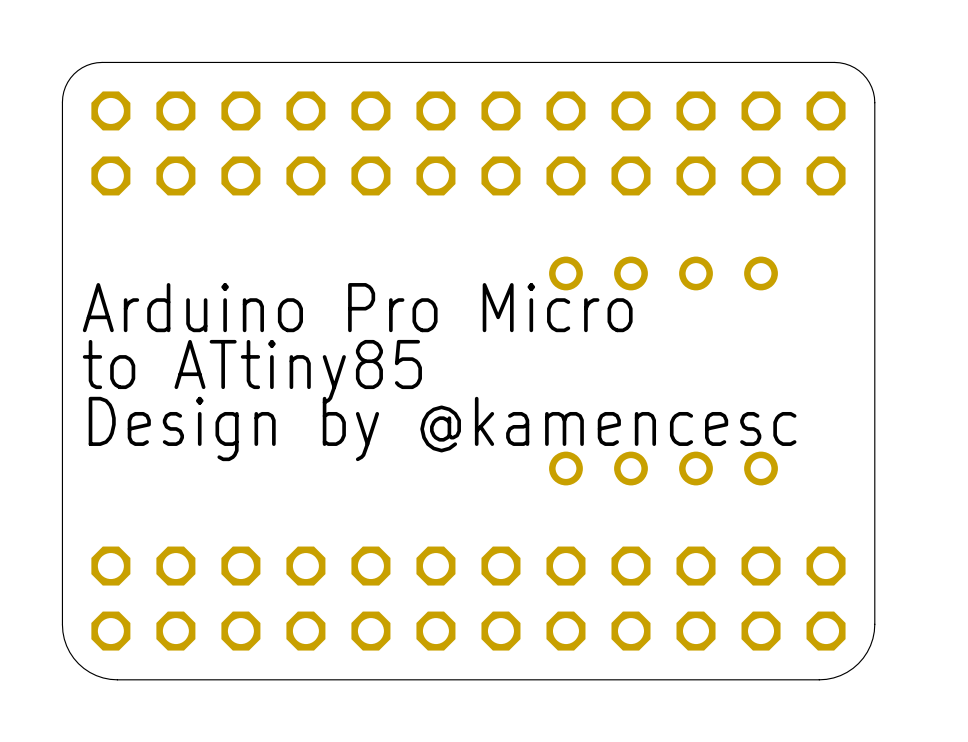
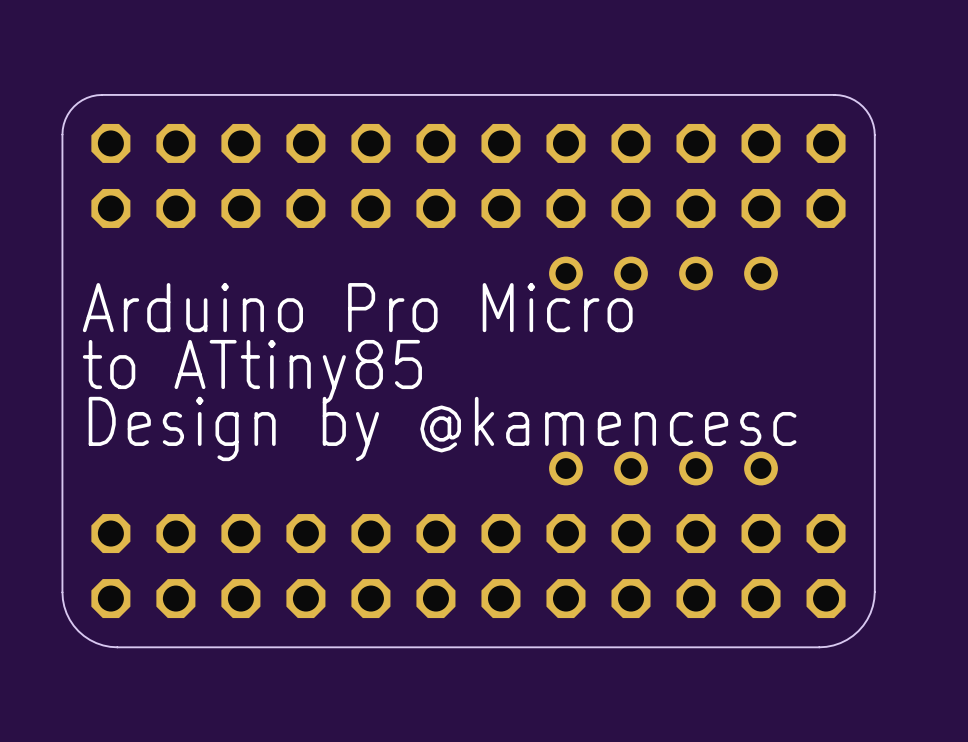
board edge: (62, 134) (62, 102) (65, 86) (77, 70) (96, 62) (834, 62) (854, 67) (869, 82) (874, 97) (874, 135) -> (62, 134) (65, 119) (74, 106) (86, 97) (102, 94) (834, 94) (849, 98) (863, 106) (871, 119) (874, 135)
part position: (468, 143) -> (468, 175)
board edge: (874, 591) (874, 631) (867, 652) (858, 663) (847, 672) (833, 677) (819, 679) (110, 679) (96, 675) (83, 668) (69, 652) (62, 632) (62, 592) -> (874, 591) (870, 613) (858, 631) (840, 643) (819, 647) (110, 646) (89, 639) (78, 631) (66, 613) (62, 592)
part position: (468, 598) -> (468, 566)

